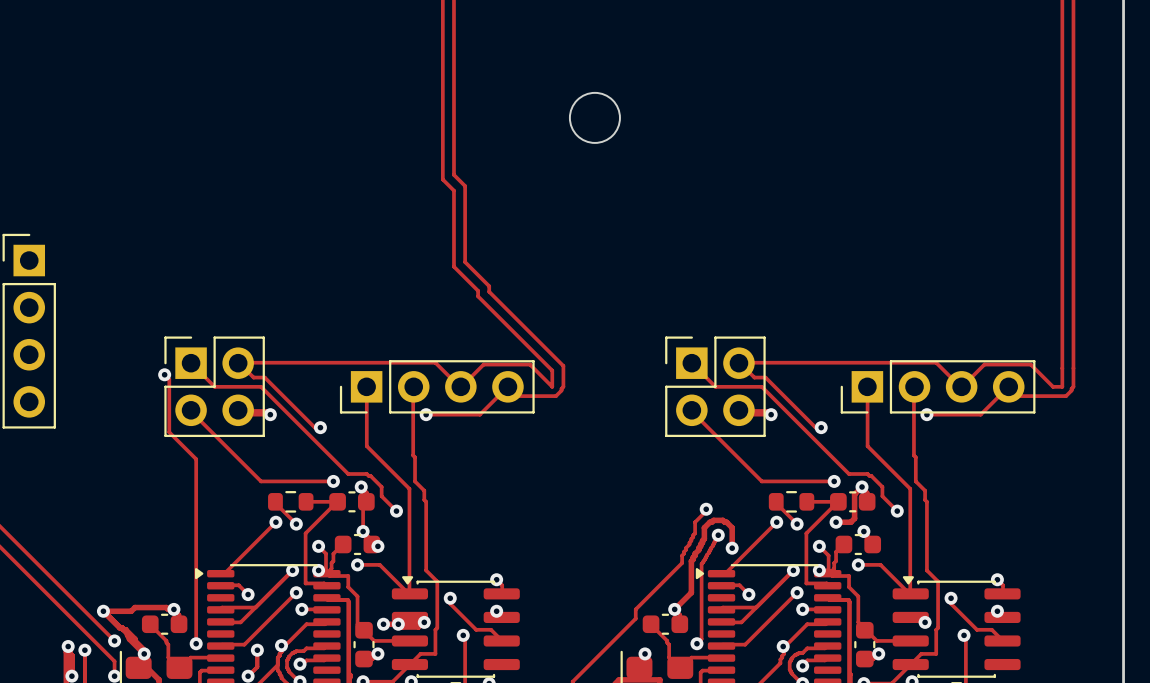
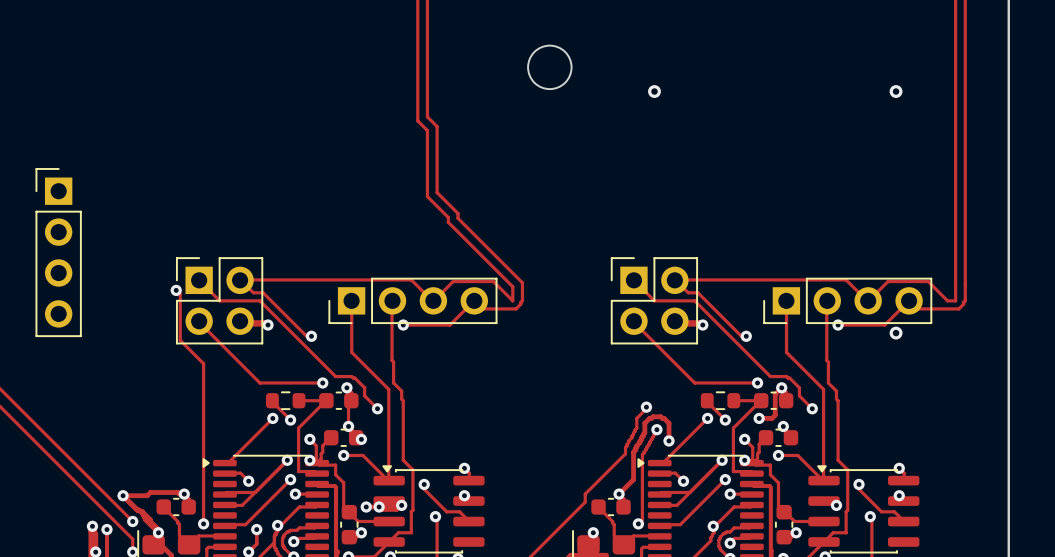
via: none -> (654, 91)
via: none -> (896, 91)
via: none -> (896, 333)

